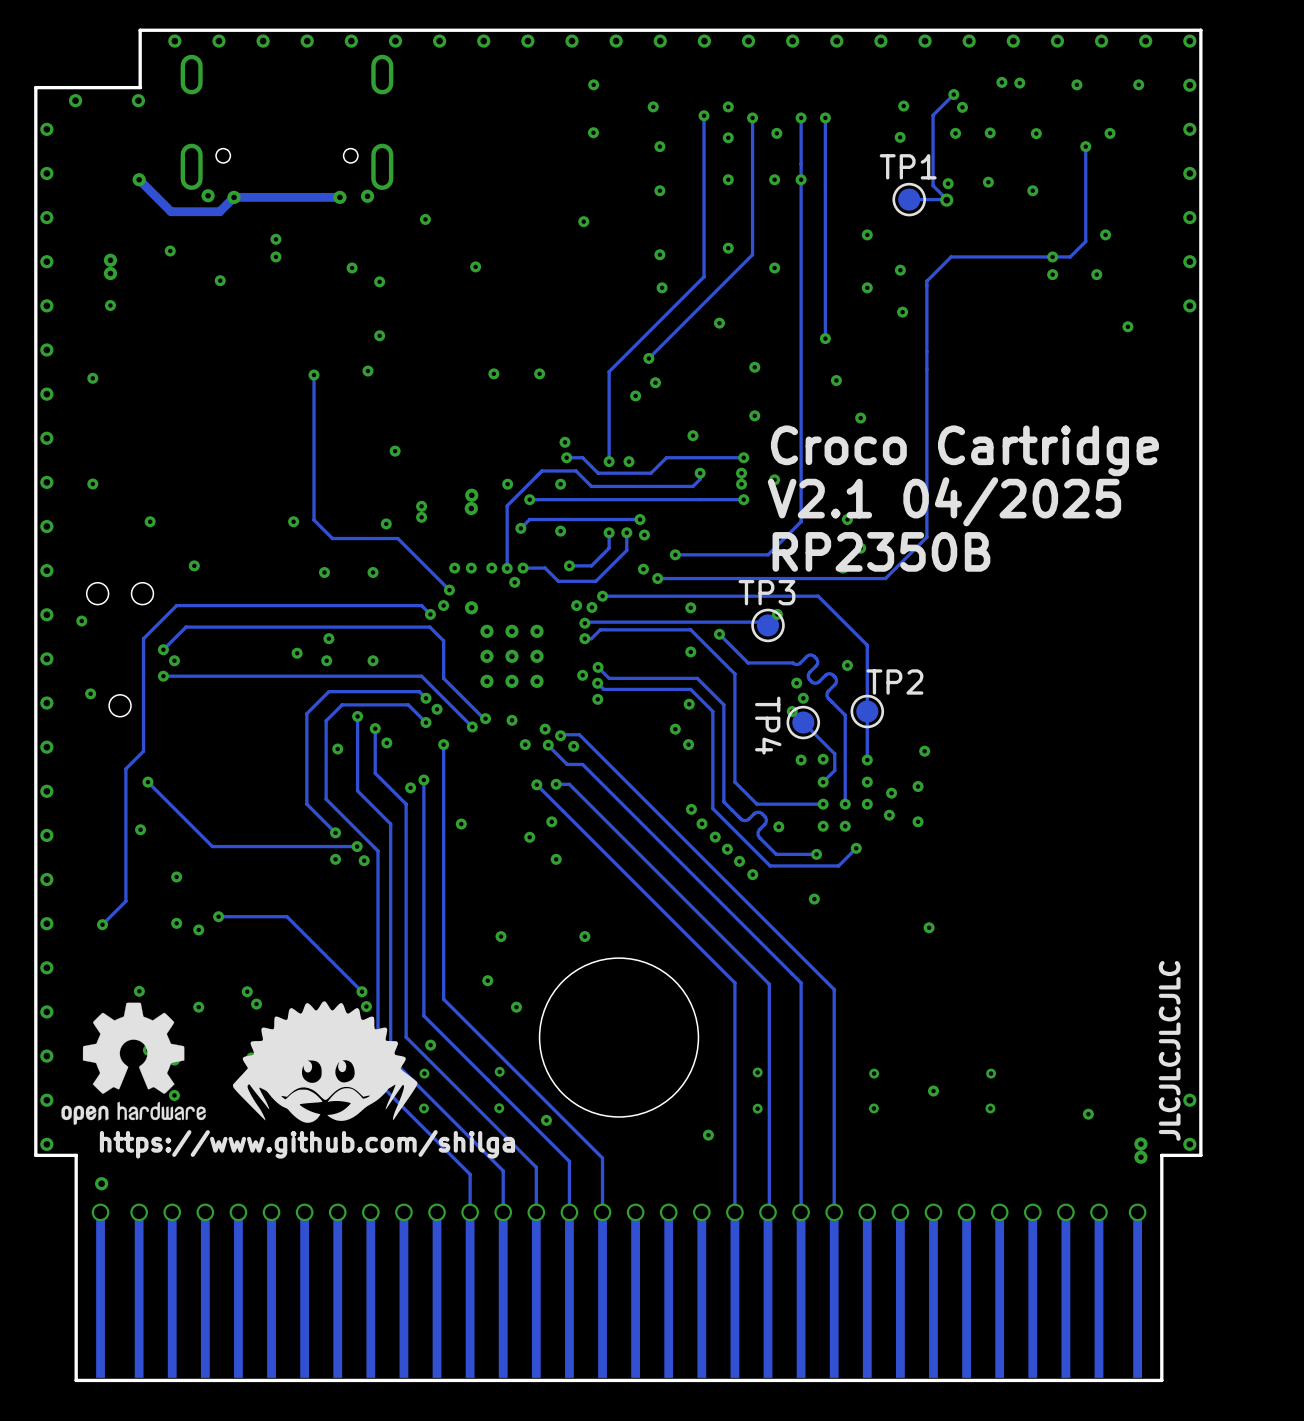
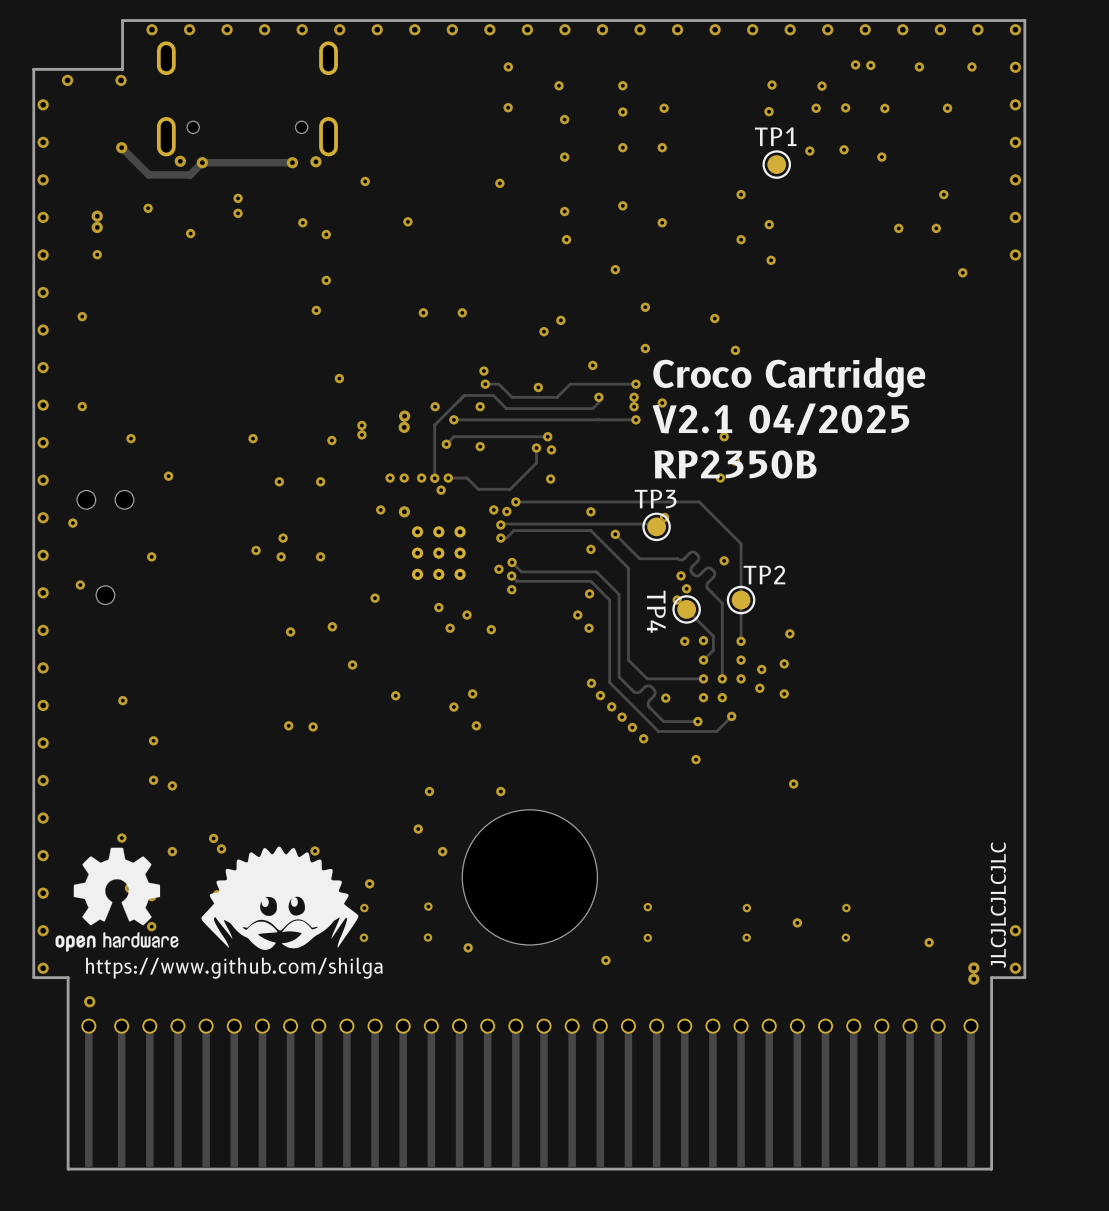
track: (953, 94) (933, 115) (933, 185) (946, 200) (909, 199) -> none
via: (953, 94) -> none
track: (704, 115) (704, 276) (609, 371) (609, 461) -> none
via: (704, 115) -> none
track: (752, 117) (752, 254) (648, 358) -> none
via: (752, 117) -> none
track: (801, 117) (801, 521) (768, 554) (675, 554) -> none
via: (801, 117) -> none
track: (825, 117) (825, 338) -> none
via: (825, 117) -> none
track: (1085, 146) (1085, 241) (1070, 256) (951, 256) (926, 281) (926, 537) (885, 578) (657, 578) -> none
via: (1085, 146) -> none
via: (801, 179) -> none
via: (946, 200) -> none
via: (1052, 256) -> none
via: (825, 338) -> none
via: (648, 358) -> none
track: (314, 375) (314, 520) (332, 538) (397, 538) (449, 590) -> none
via: (314, 375) -> none
via: (609, 461) -> none
track: (609, 532) (609, 548) (591, 565) (569, 565) -> none
via: (609, 532) -> none
via: (675, 554) -> none
via: (569, 565) -> none
via: (657, 578) -> none
via: (449, 590) -> none
track: (430, 614) (421, 605) (176, 605) (143, 638) (143, 751) (125, 768) (125, 901) (102, 924) -> none
via: (430, 614) -> none
track: (163, 649) (186, 627) (429, 627) (443, 640) (443, 678) (485, 718) -> none
via: (163, 649) -> none
track: (163, 676) (421, 676) (472, 726) -> none
via: (163, 676) -> none
track: (425, 698) (419, 691) (328, 691) (306, 713) (306, 804) (335, 832) -> none
via: (425, 698) -> none
track: (357, 716) (357, 790) (390, 824) (390, 1058) (503, 1170) (503, 1212) -> none
via: (357, 716) -> none
via: (485, 718) -> none
track: (425, 722) (408, 704) (342, 704) (326, 720) (326, 799) (378, 851) (378, 1082) (470, 1174) (470, 1212) -> none
via: (425, 722) -> none
via: (472, 726) -> none
track: (375, 728) (375, 773) (406, 804) (406, 1037) (536, 1167) (536, 1212) -> none
via: (375, 728) -> none
track: (560, 735) (579, 734) (834, 989) (834, 1212) -> none
via: (560, 735) -> none
track: (443, 744) (443, 999) (602, 1158) (602, 1212) -> none
via: (443, 744) -> none
track: (548, 745) (567, 764) (582, 764) (801, 982) (801, 1212) -> none
via: (548, 745) -> none
track: (423, 780) (423, 1015) (569, 1161) (569, 1212) -> none
via: (423, 780) -> none
track: (147, 782) (212, 846) (357, 846) -> none
via: (147, 782) -> none
track: (536, 784) (734, 982) (734, 1212) -> none
via: (536, 784) -> none
track: (556, 784) (569, 784) (769, 984) (768, 1212) -> none
via: (556, 784) -> none
via: (335, 832) -> none
via: (357, 846) -> none
track: (218, 916) (286, 916) (362, 991) -> none
via: (218, 916) -> none
via: (102, 924) -> none
via: (362, 991) -> none

